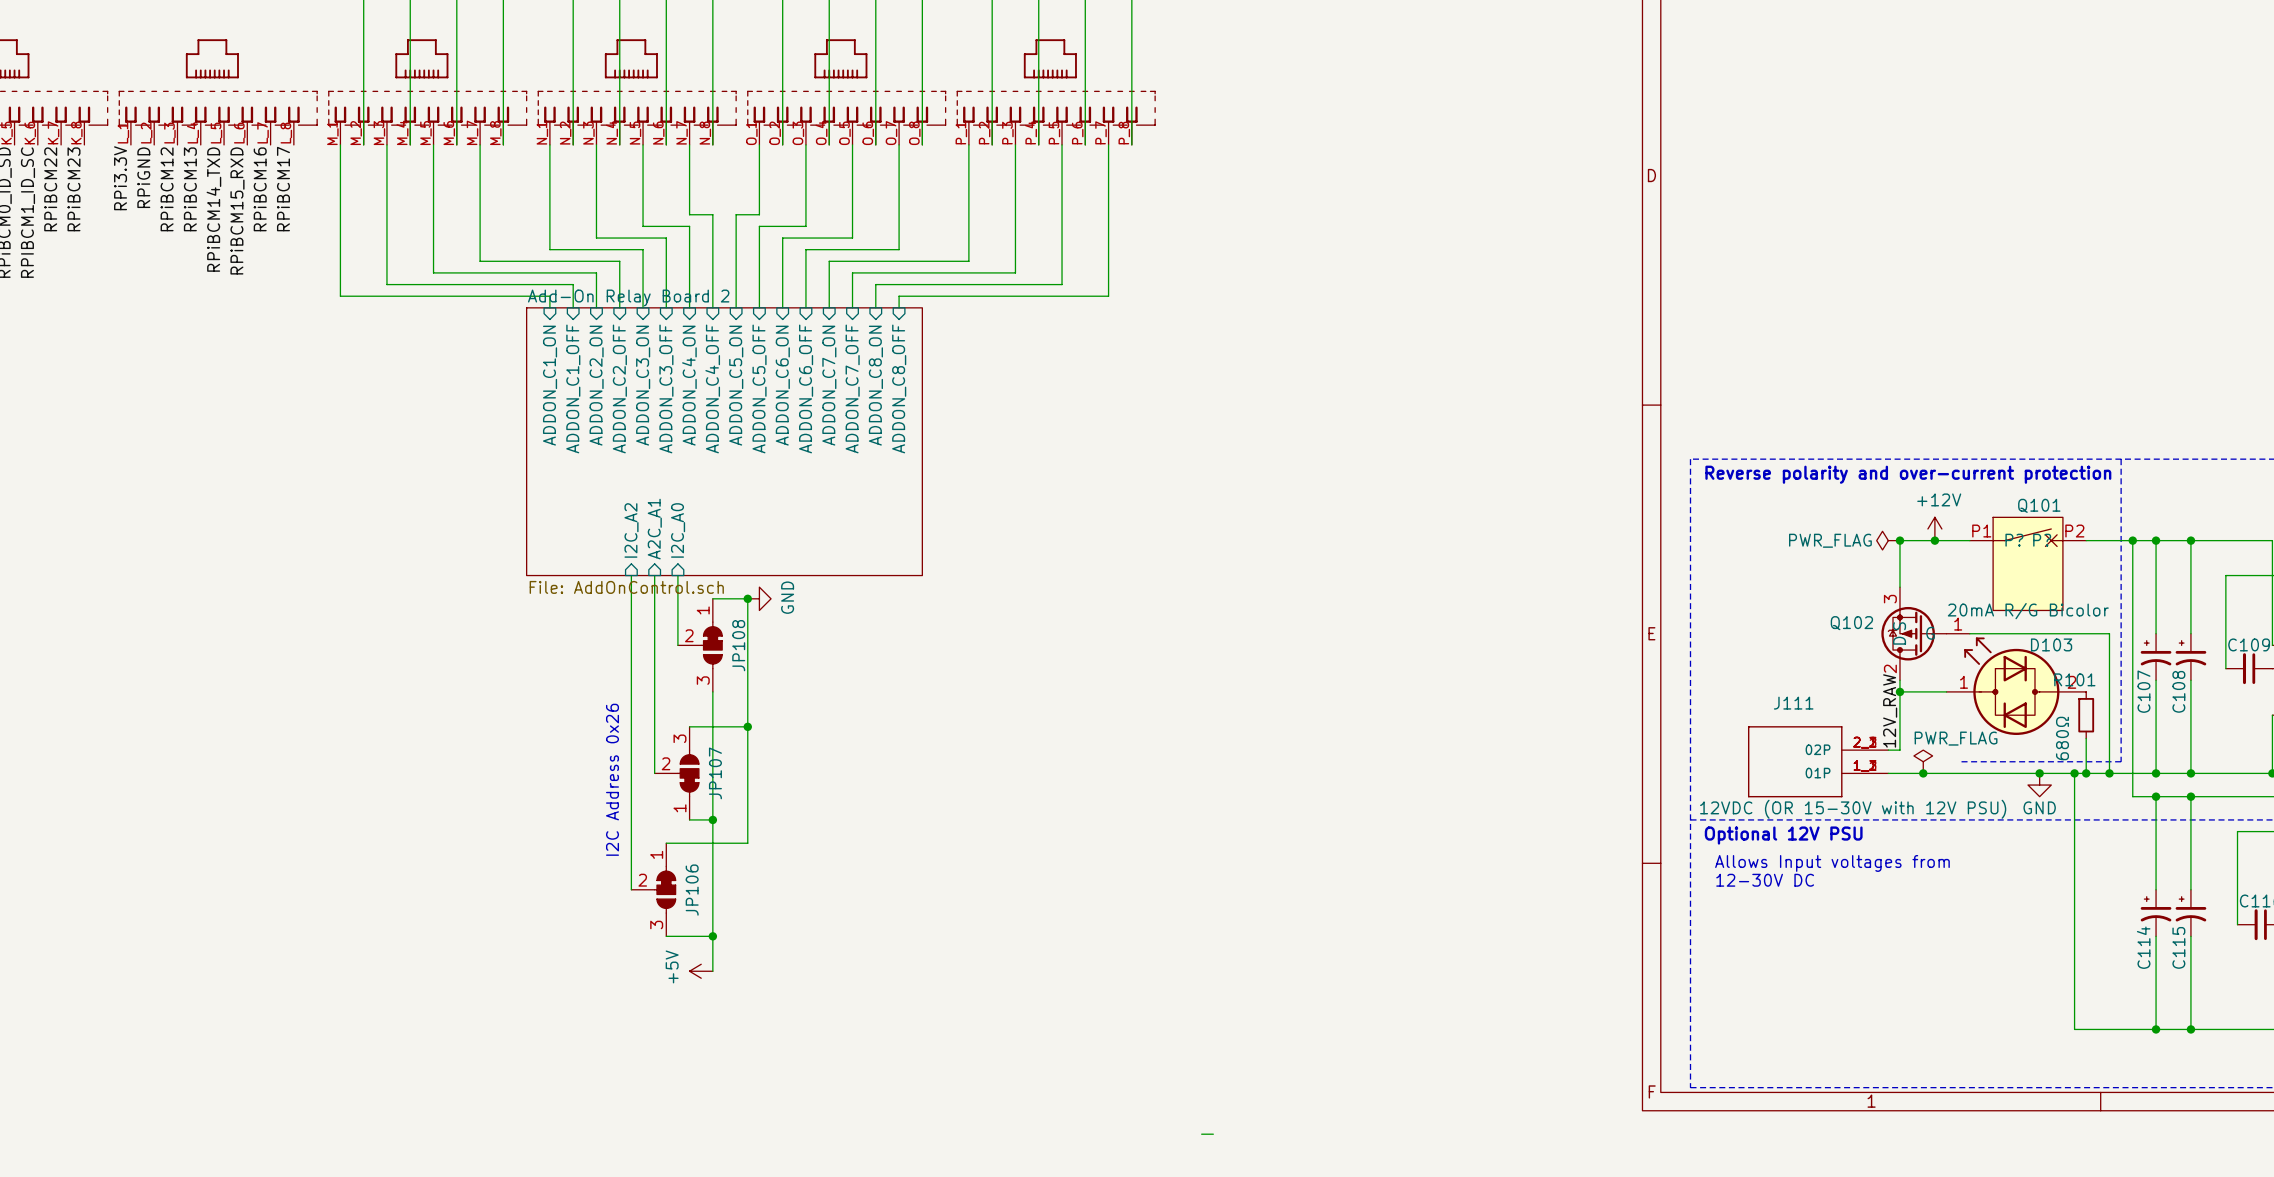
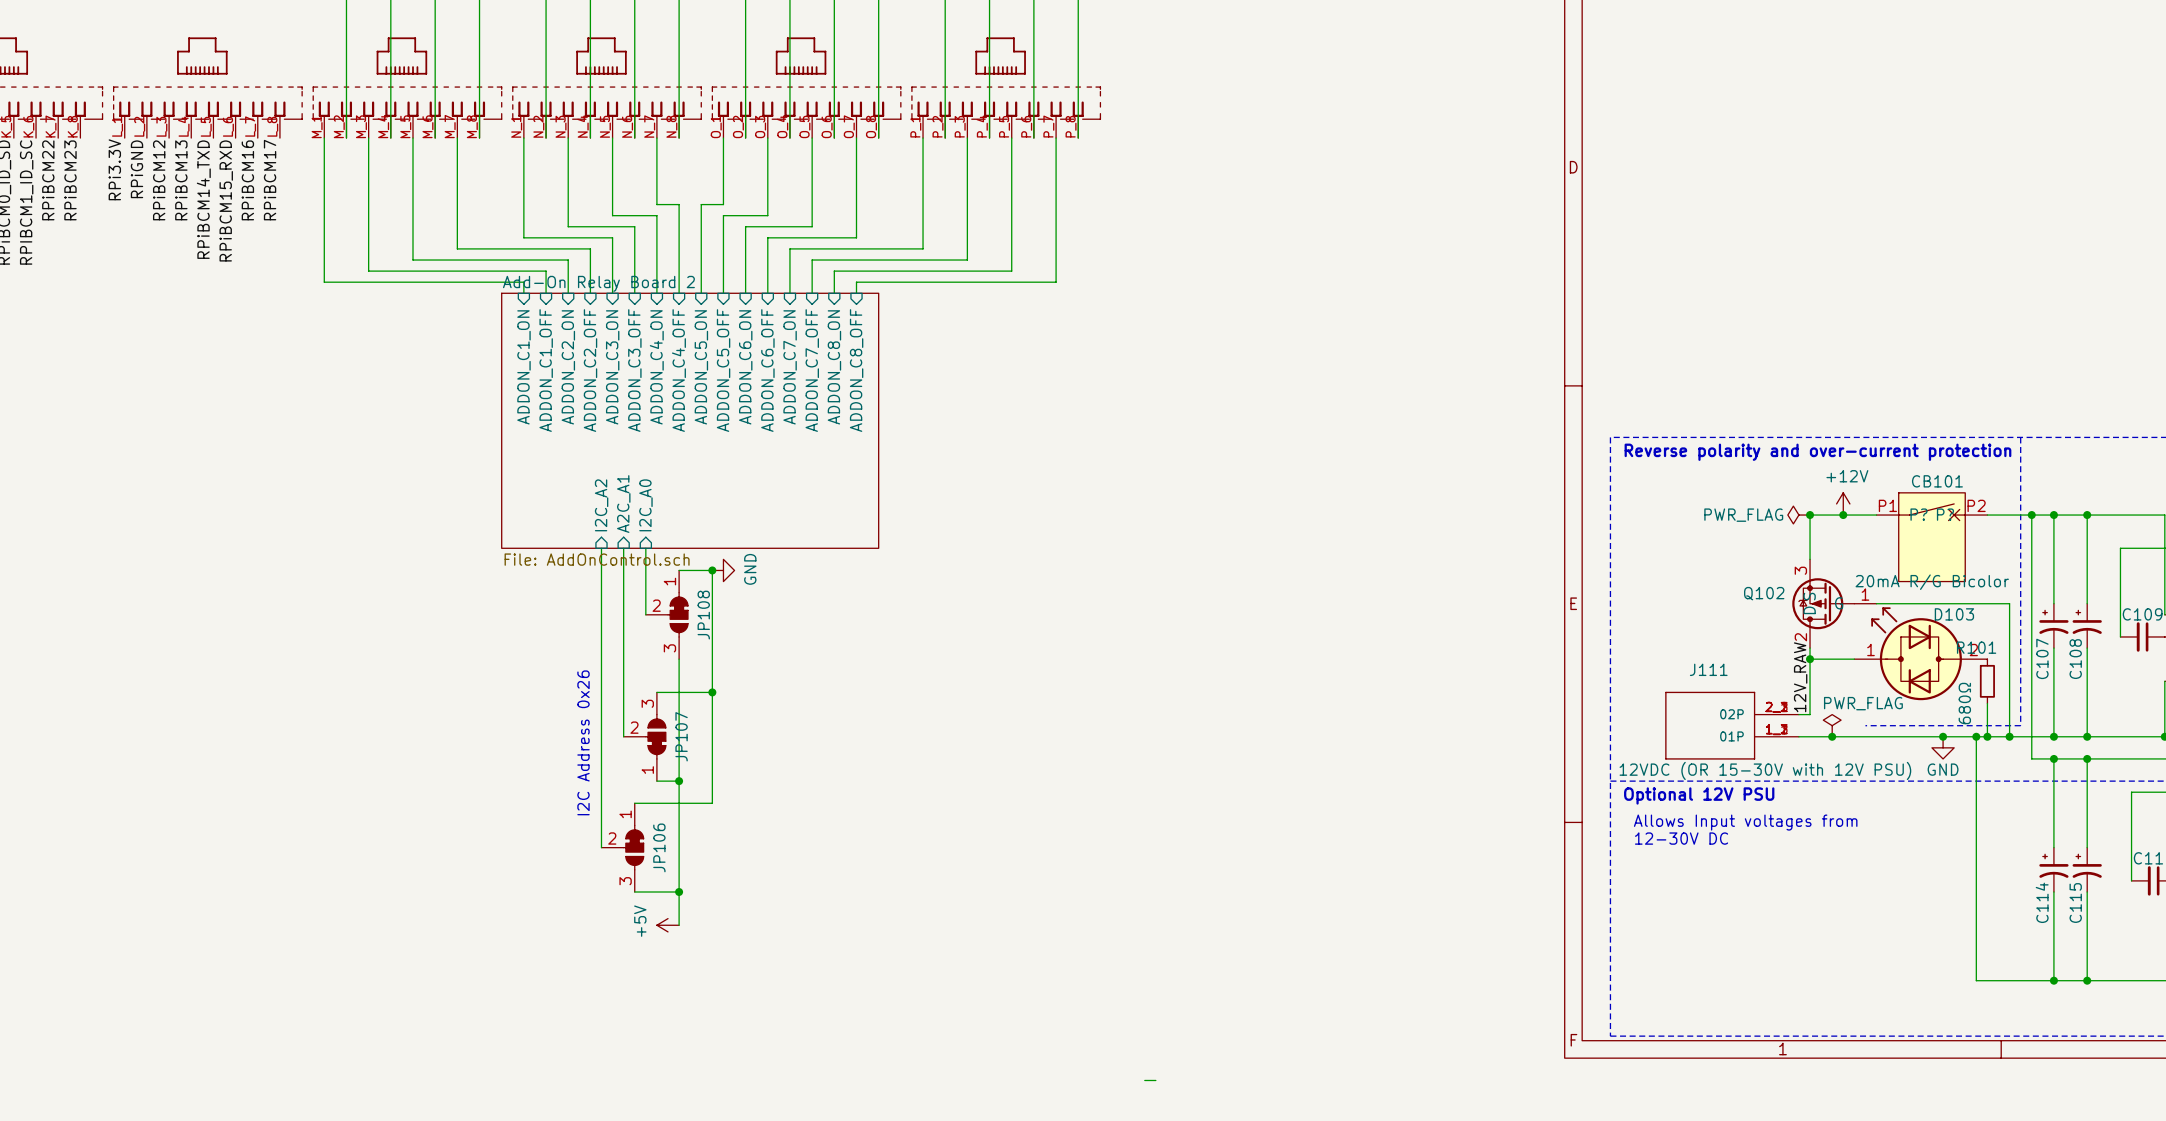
Q101 name: Q101 (2039, 505) -> CB101 (1937, 481)

